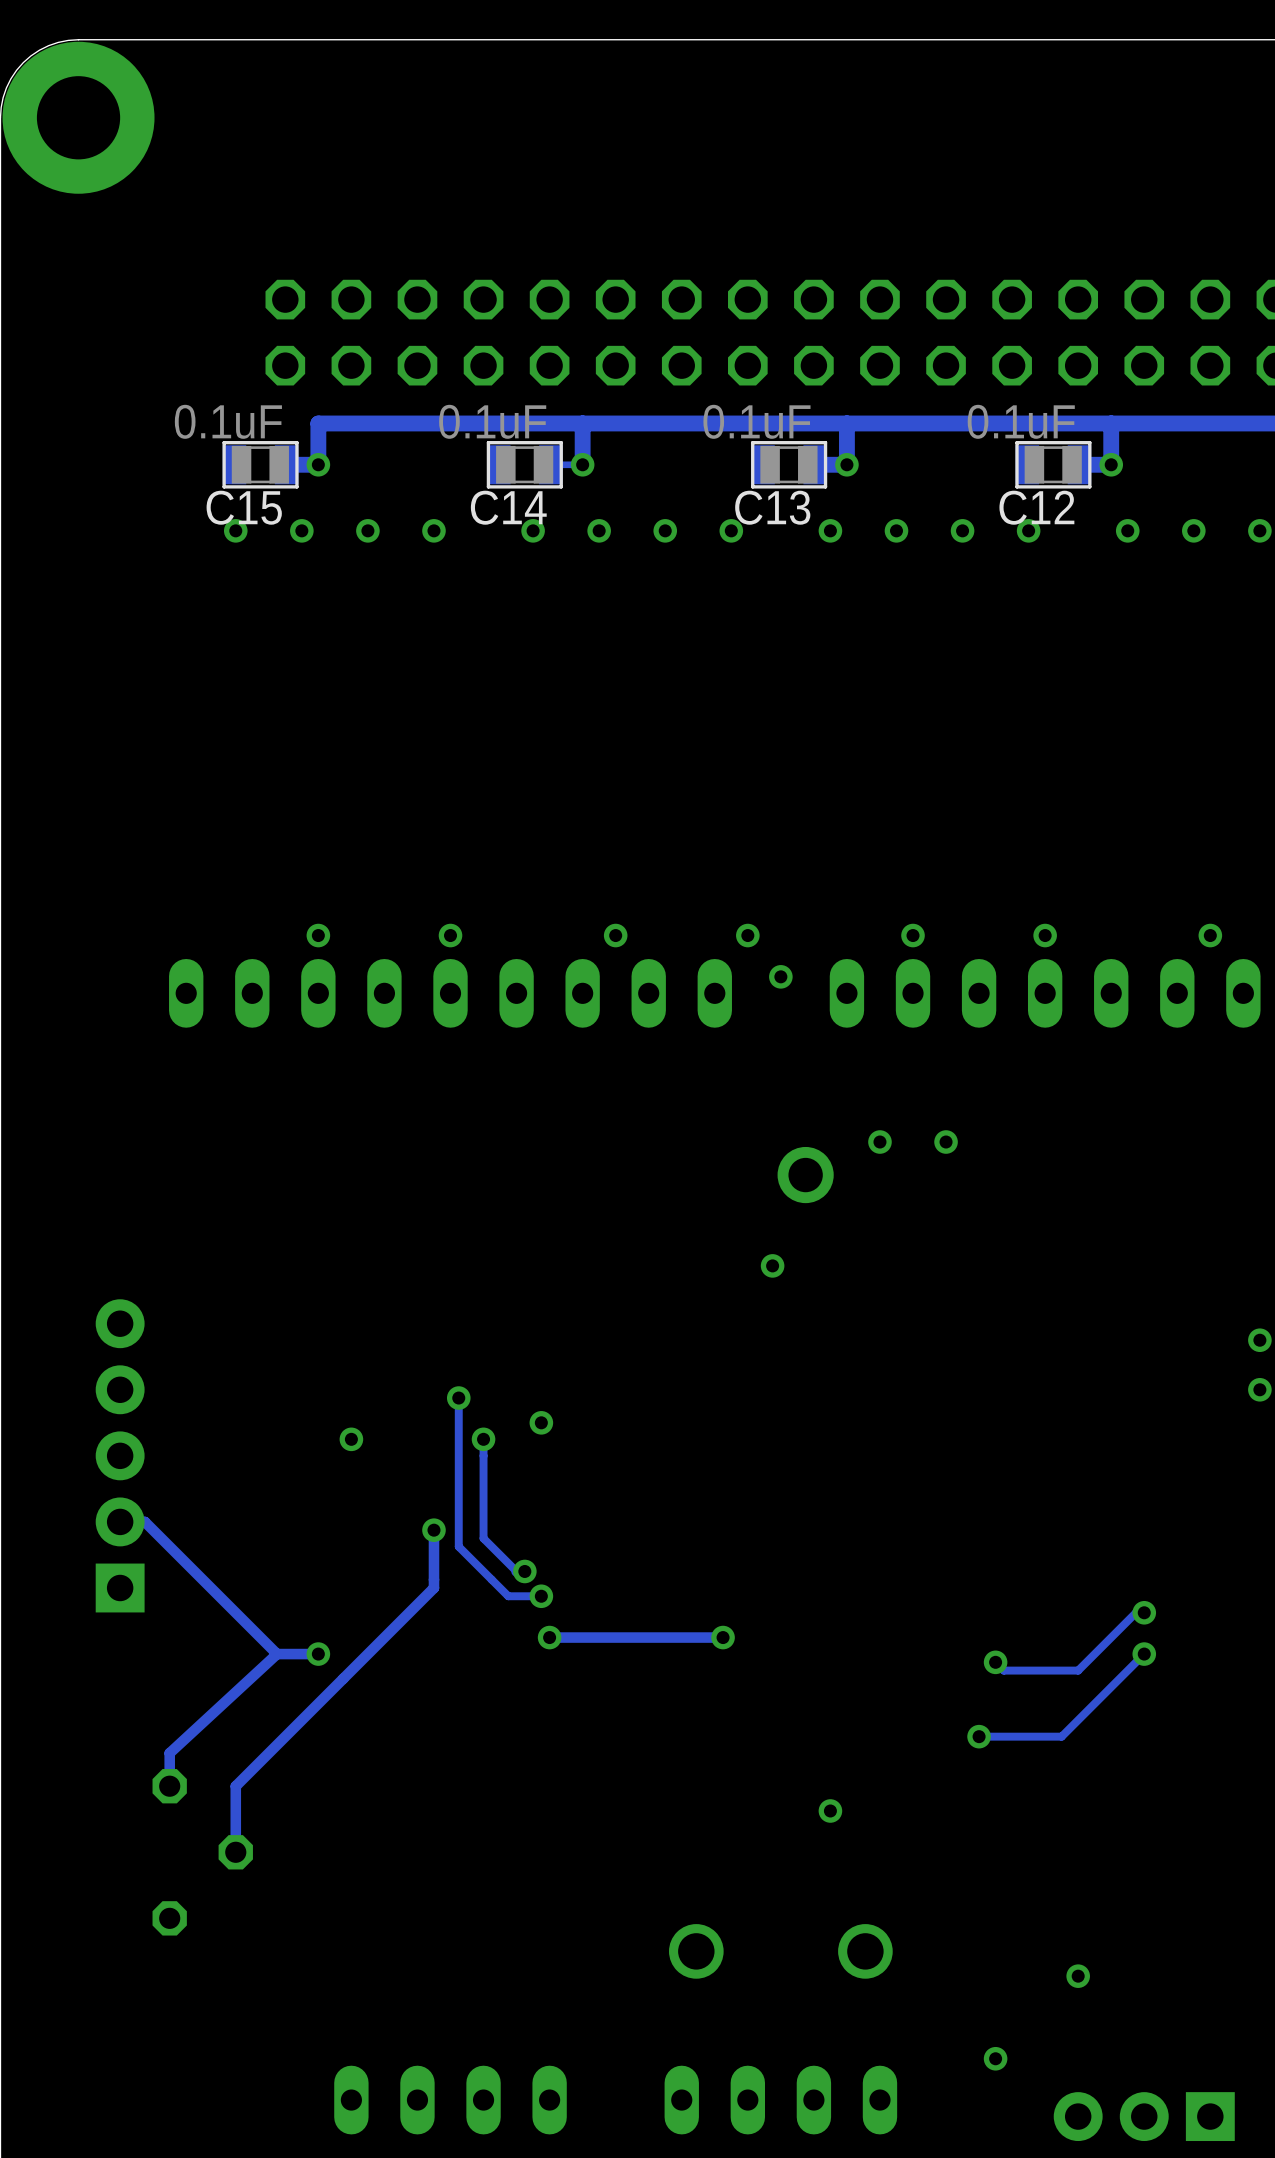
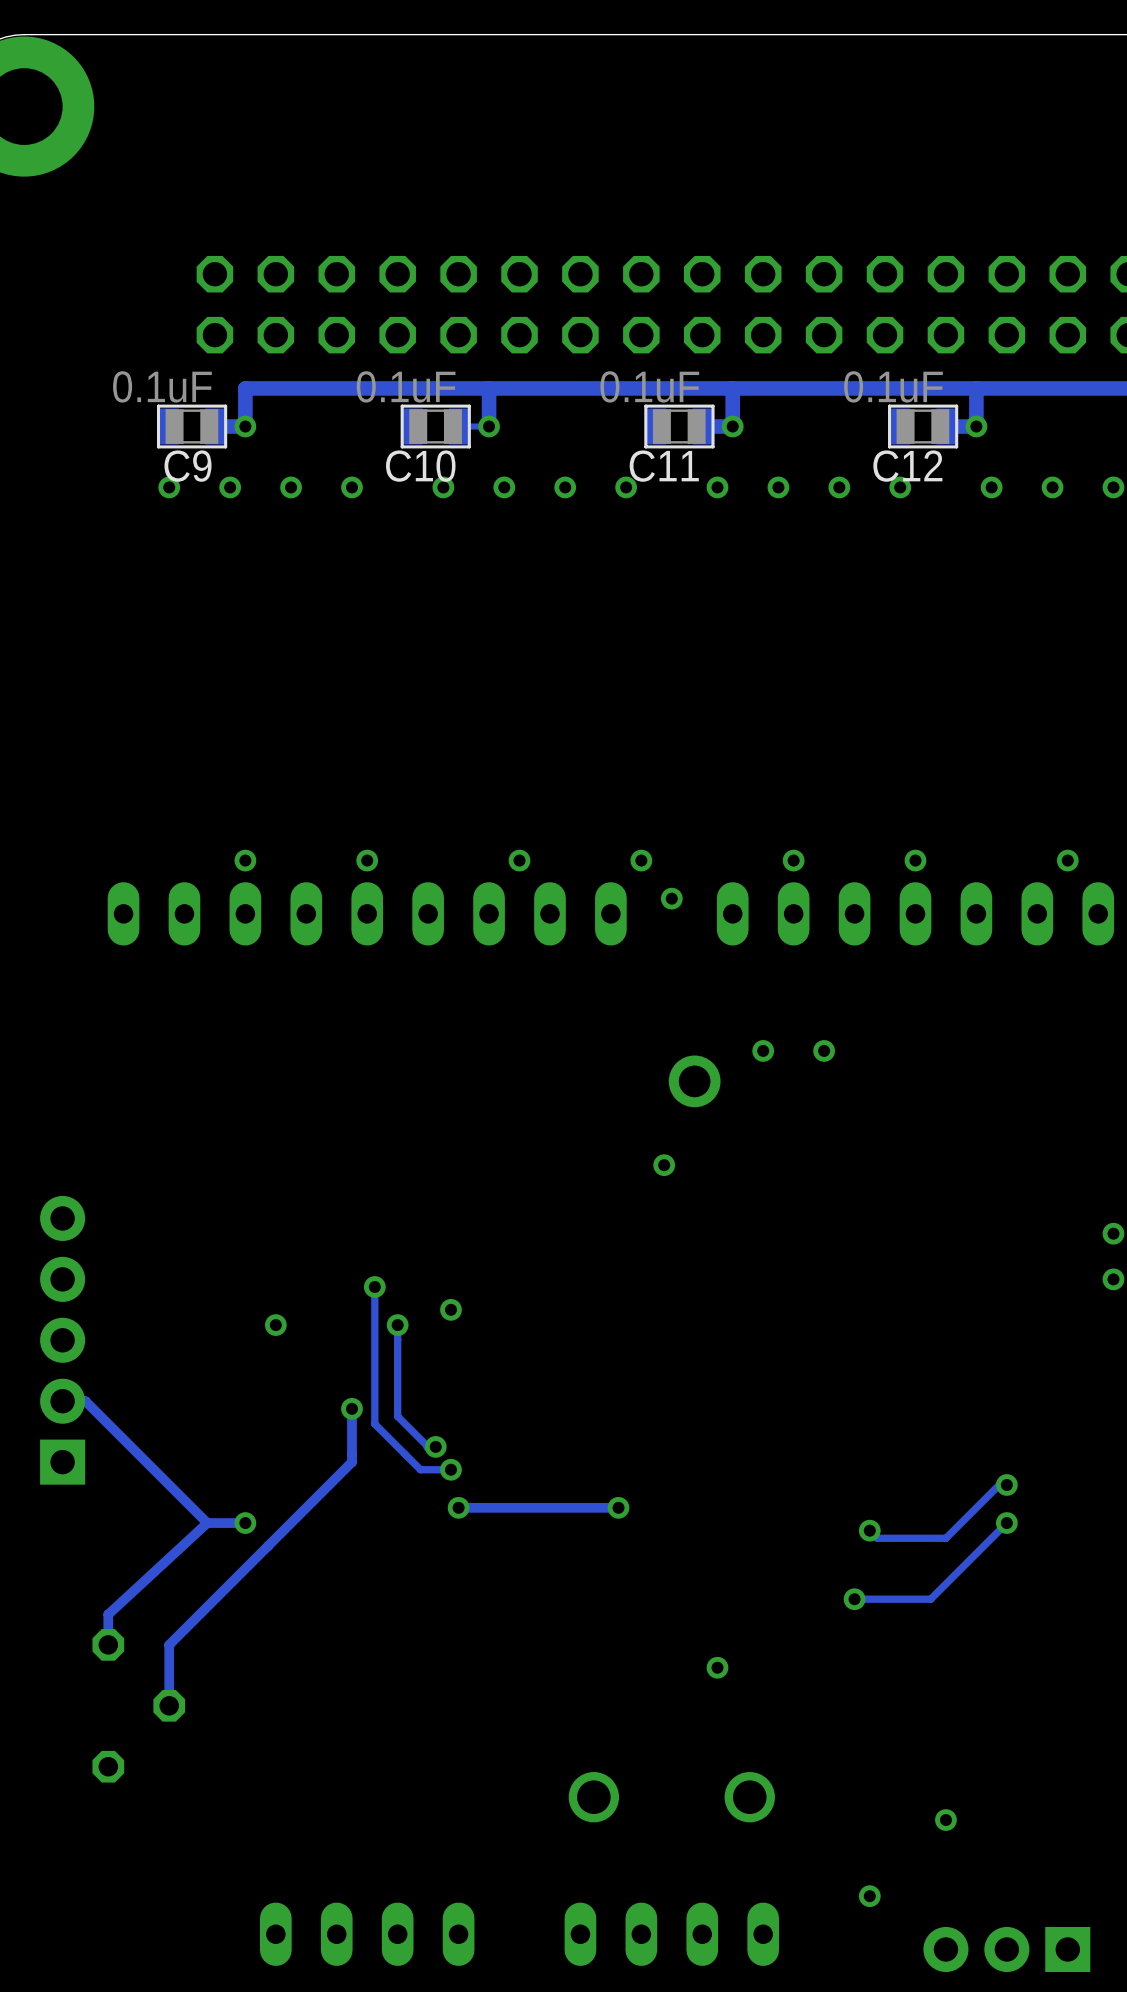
C15 name: C15 (244, 507) -> C9 (188, 466)
C14 name: C14 (508, 507) -> C10 (420, 466)
C13 name: C13 (772, 507) -> C11 (664, 466)

